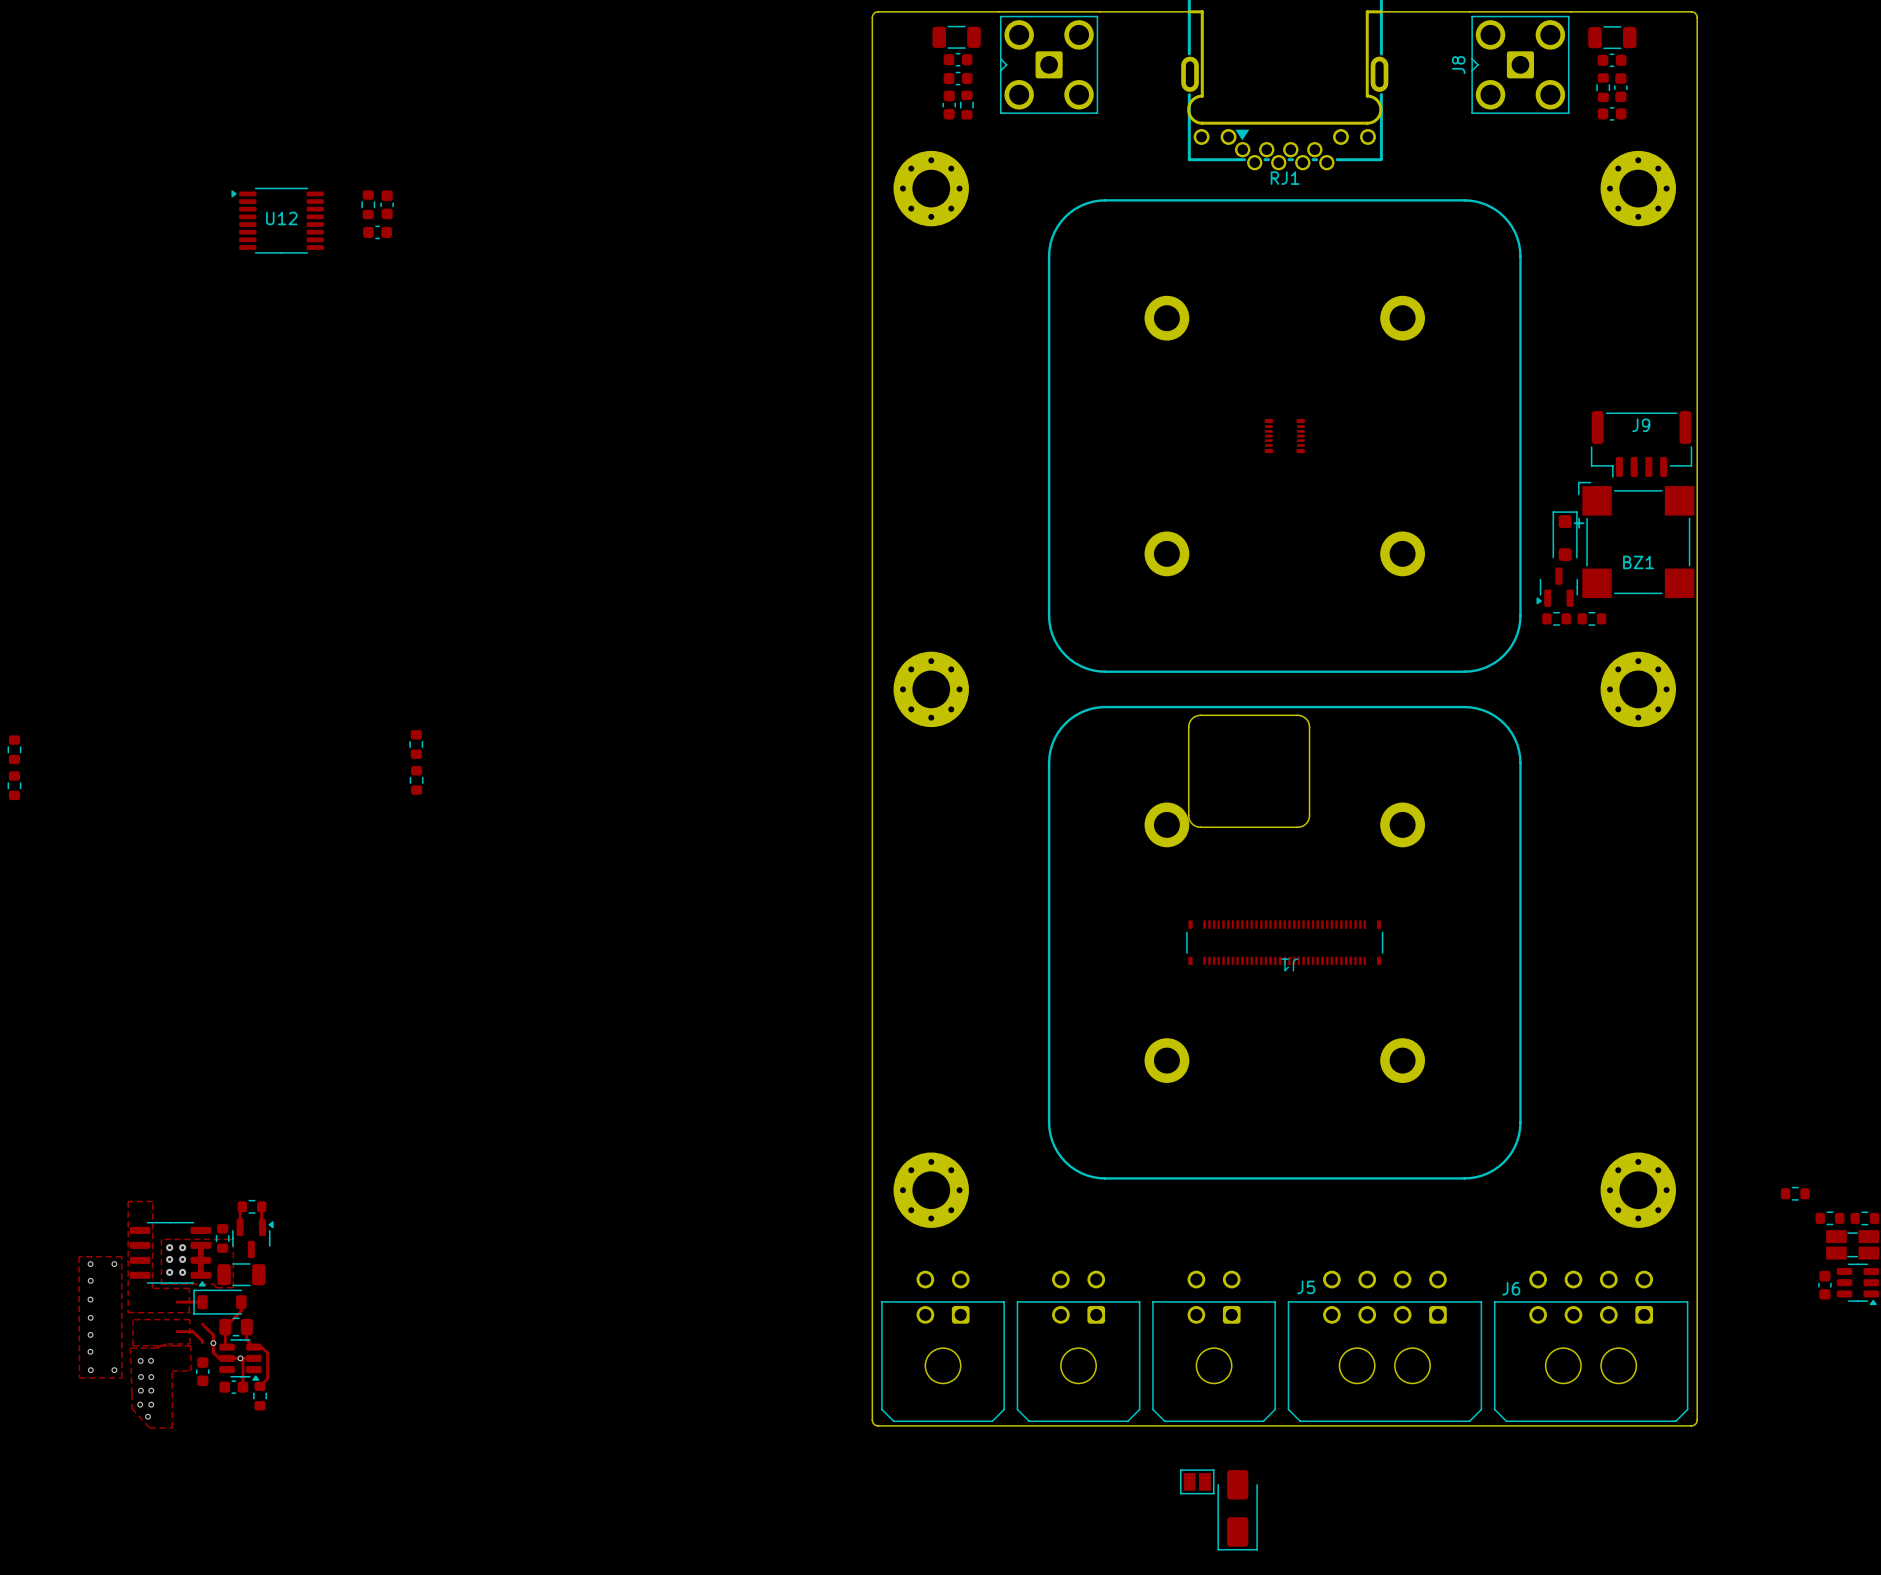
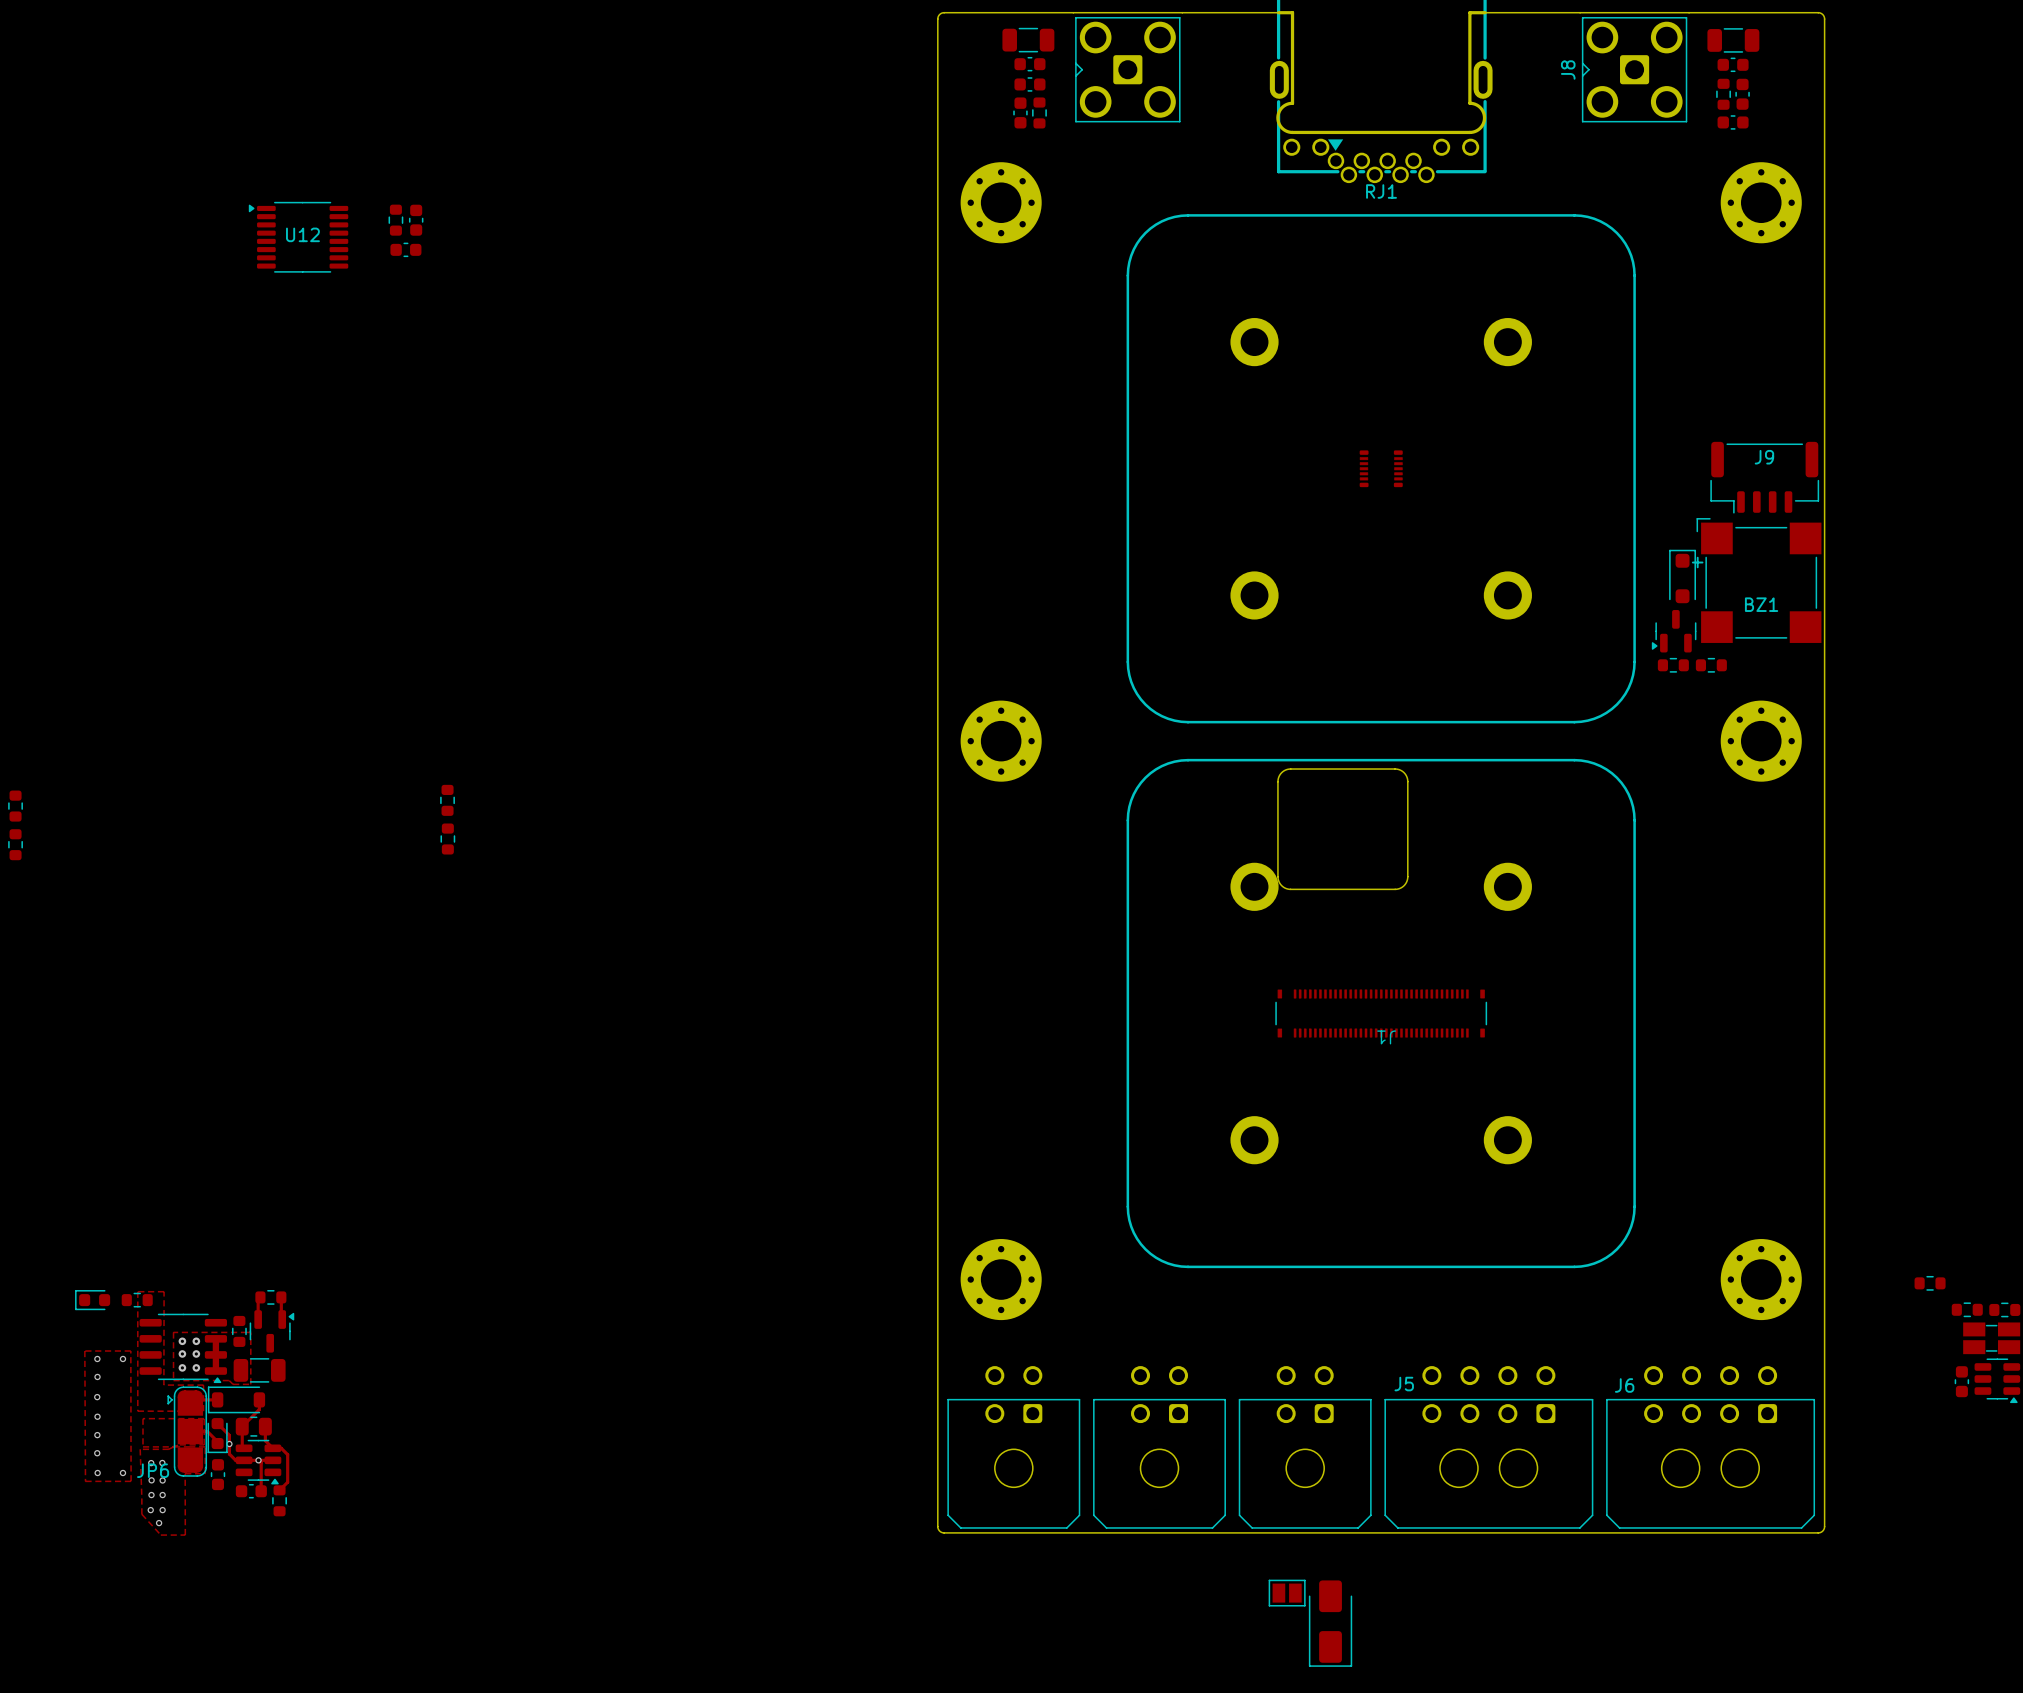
part: none -> (92, 1300)
part: none -> (137, 1300)
JP6: none -> (187, 1431)
part: none -> (217, 1435)

